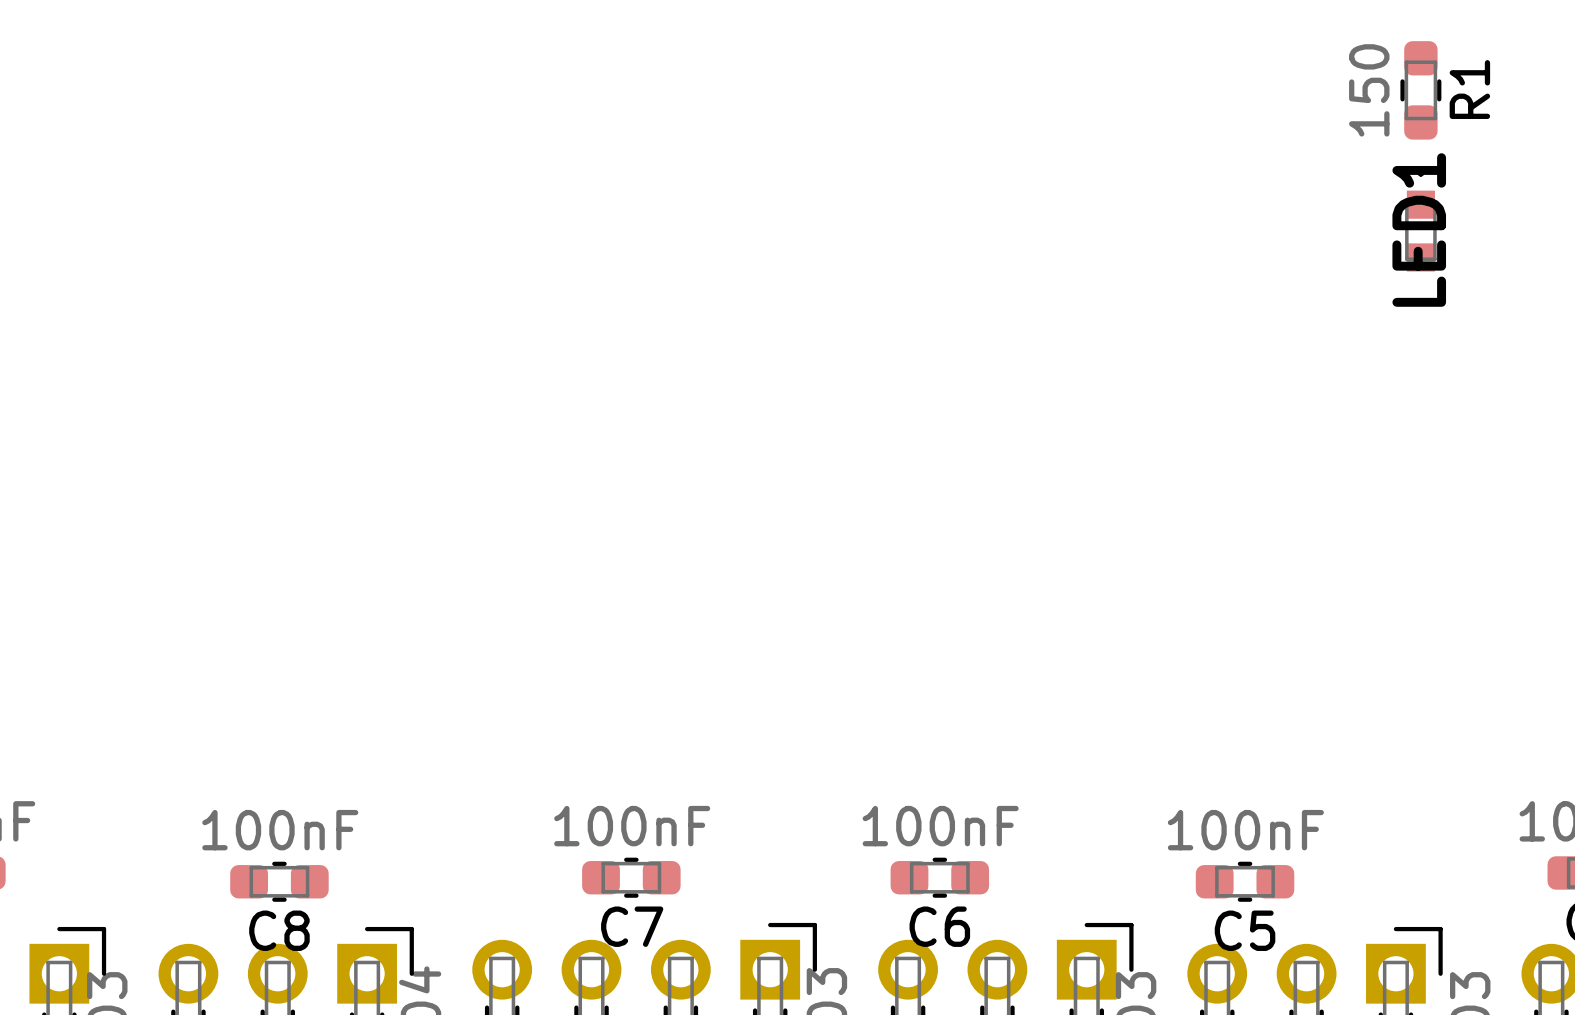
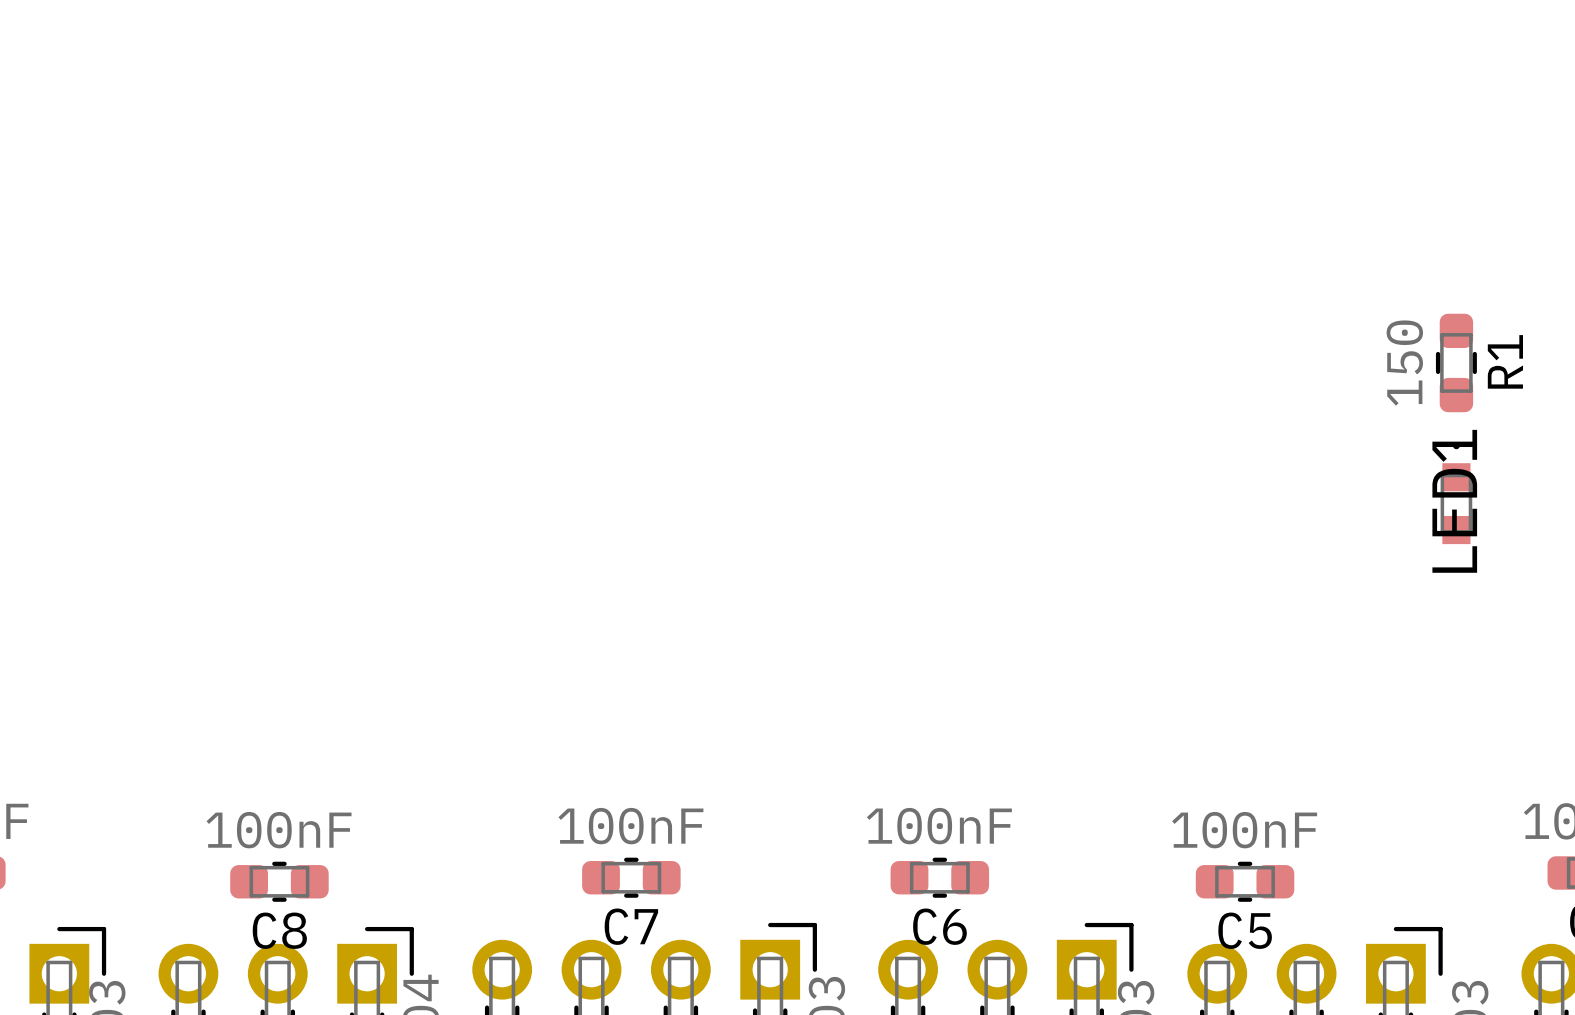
R1 position: (1420, 90) -> (1456, 362)
LED1 position: (1420, 220) -> (1456, 493)

